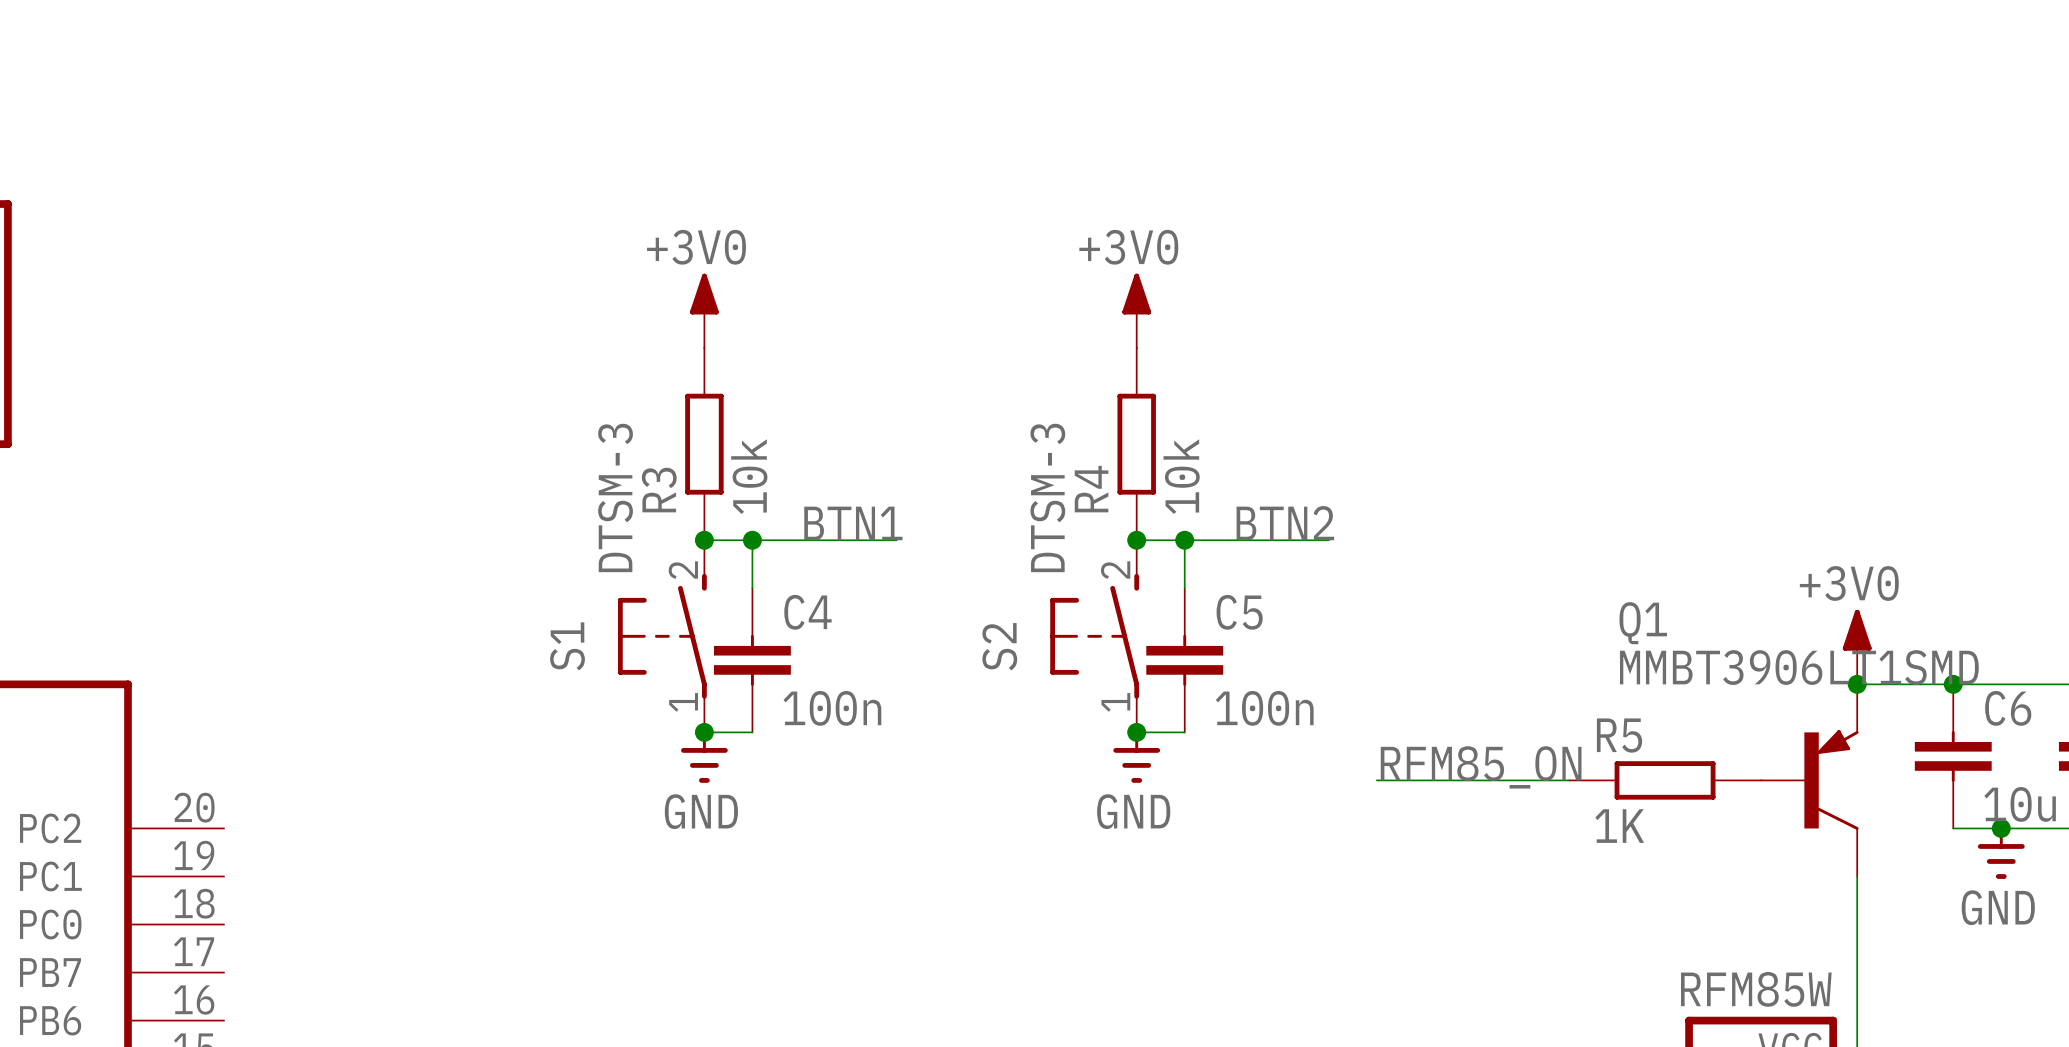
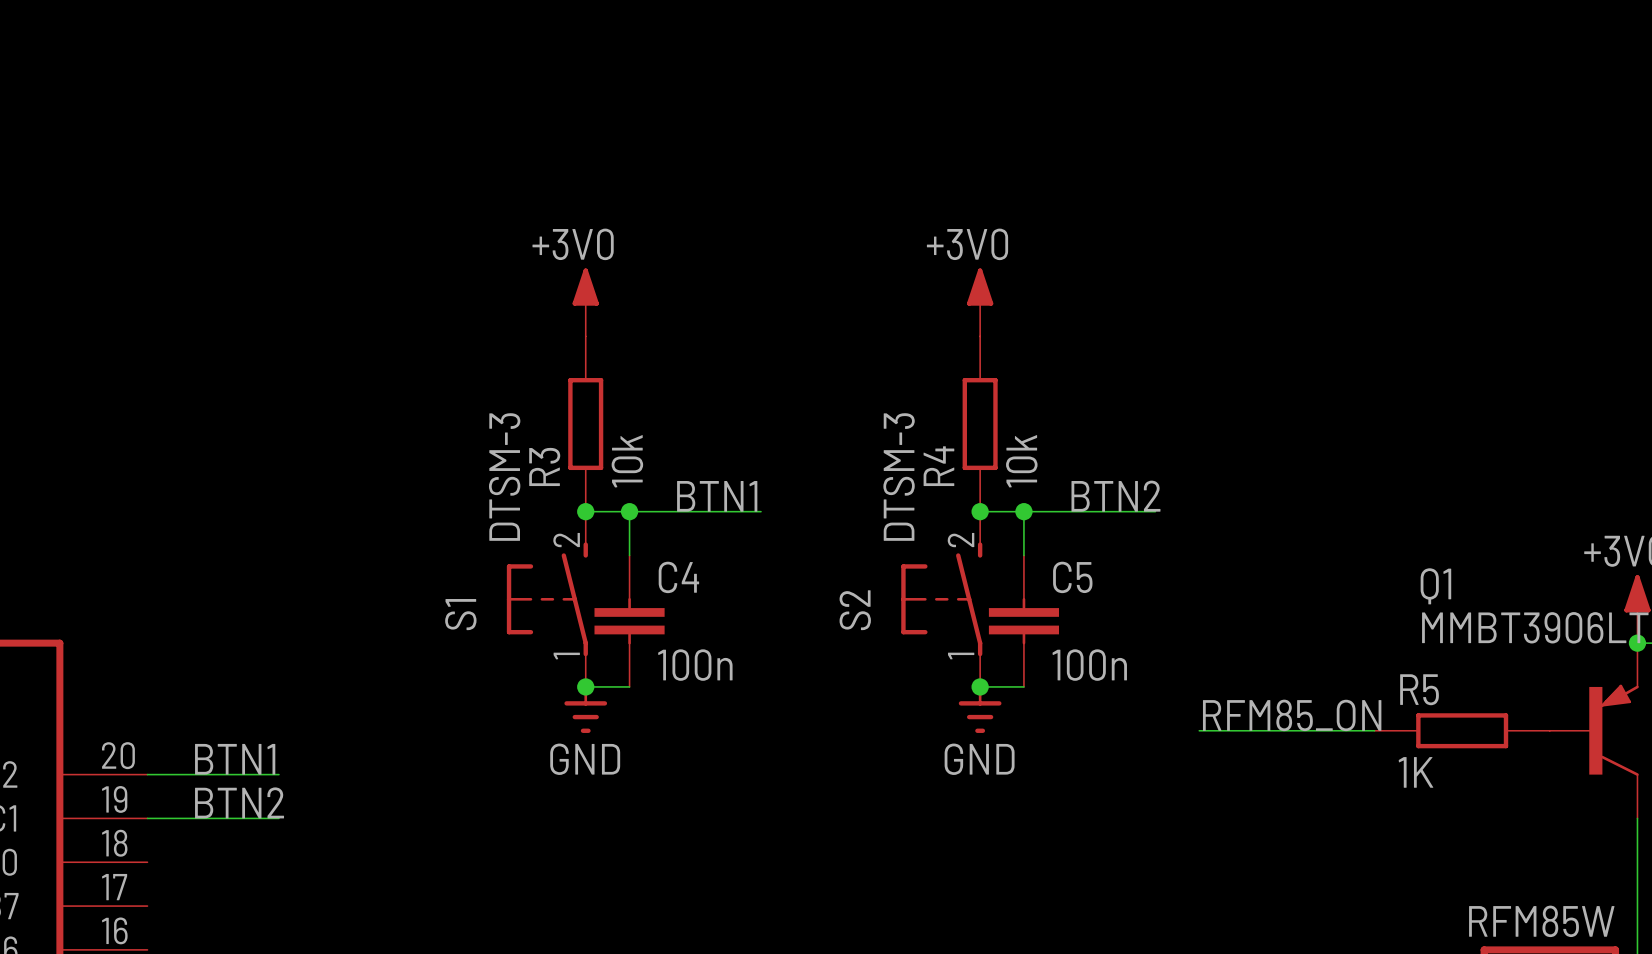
label: none -> BTN1 (235, 759)
wire: none -> (147, 774) (278, 774)
label: none -> BTN2 (239, 802)
wire: none -> (147, 818) (278, 818)

